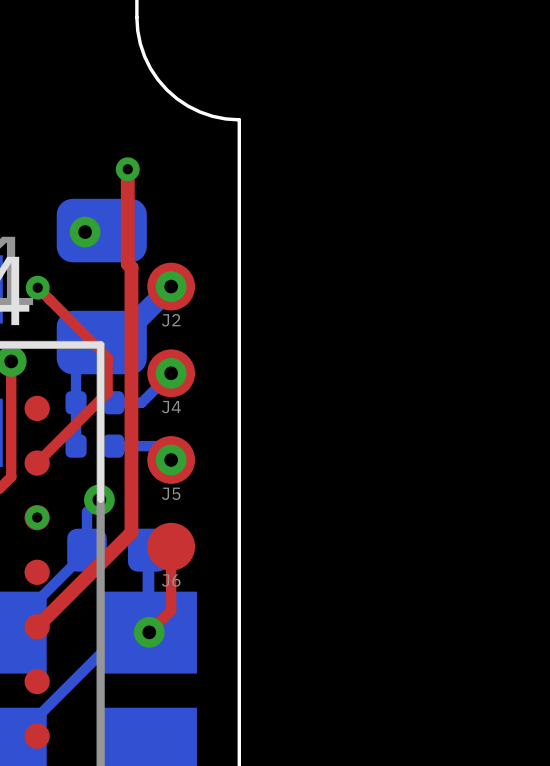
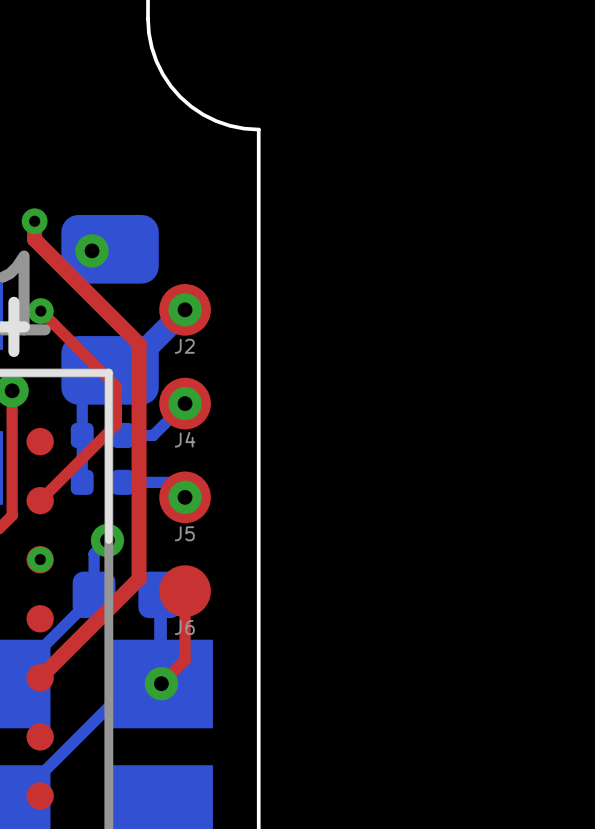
top track: (127, 169) (127, 263) (131, 267) (131, 532) (128, 535) -> (34, 221) (34, 239) (139, 343) (139, 578)
via position: (127, 169) -> (34, 221)

